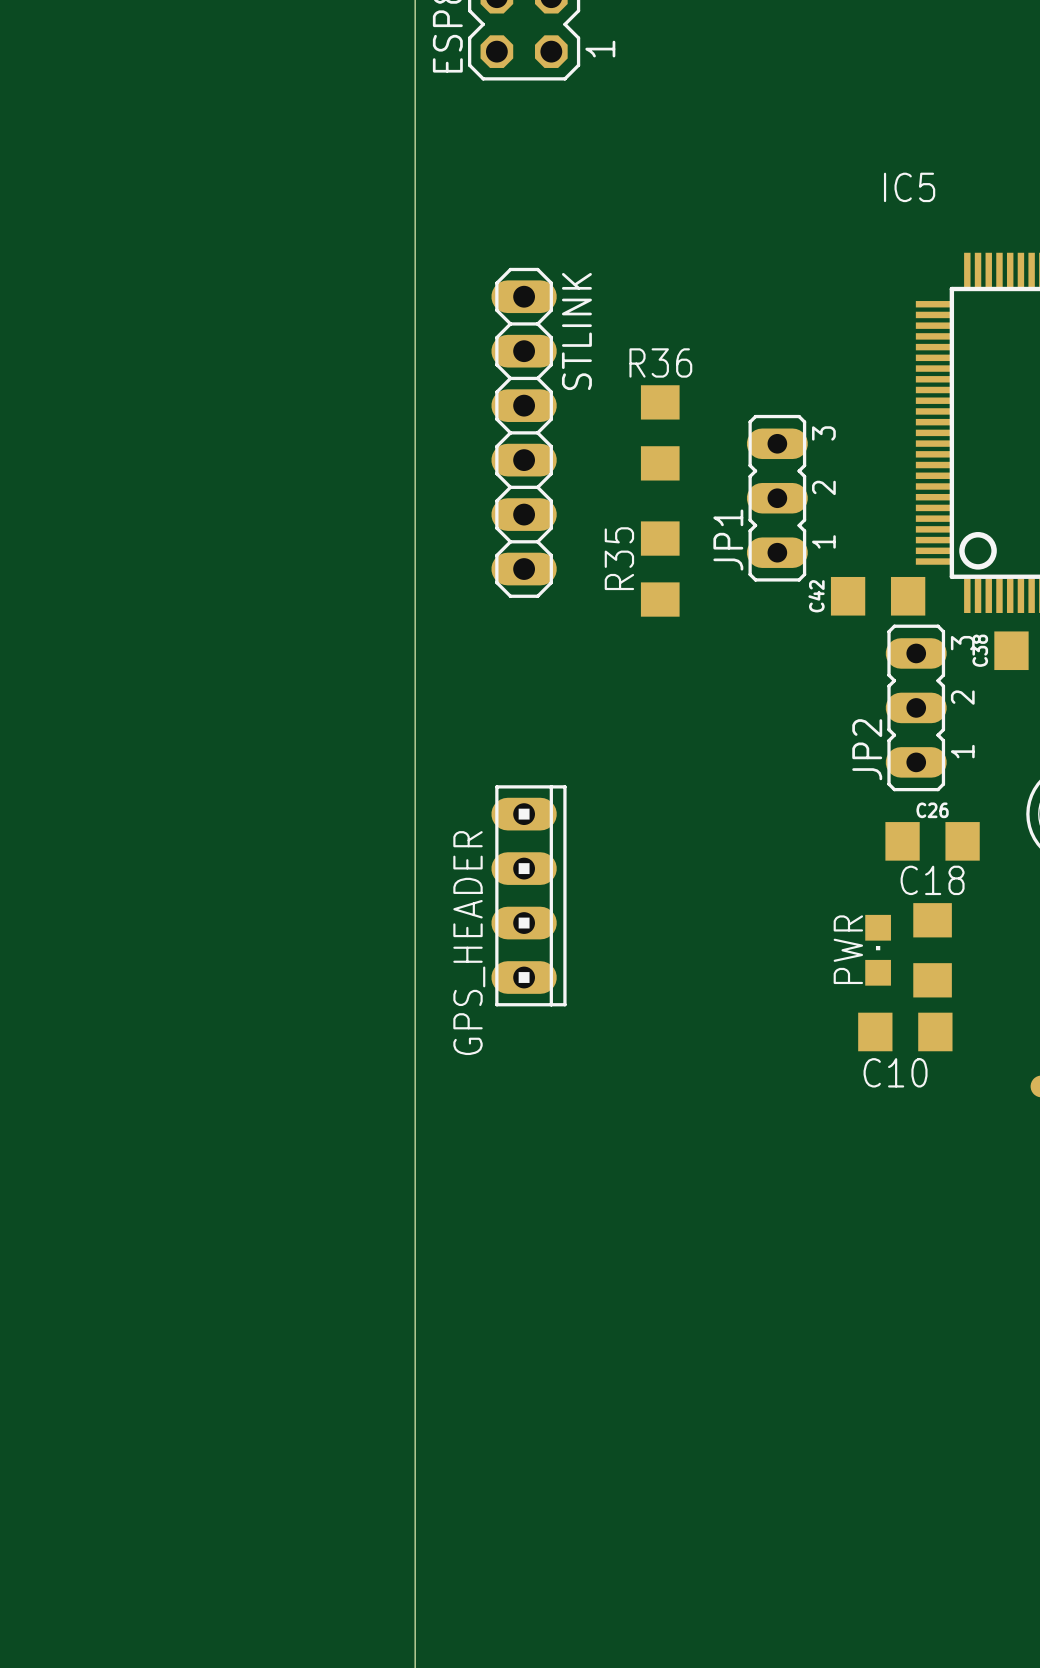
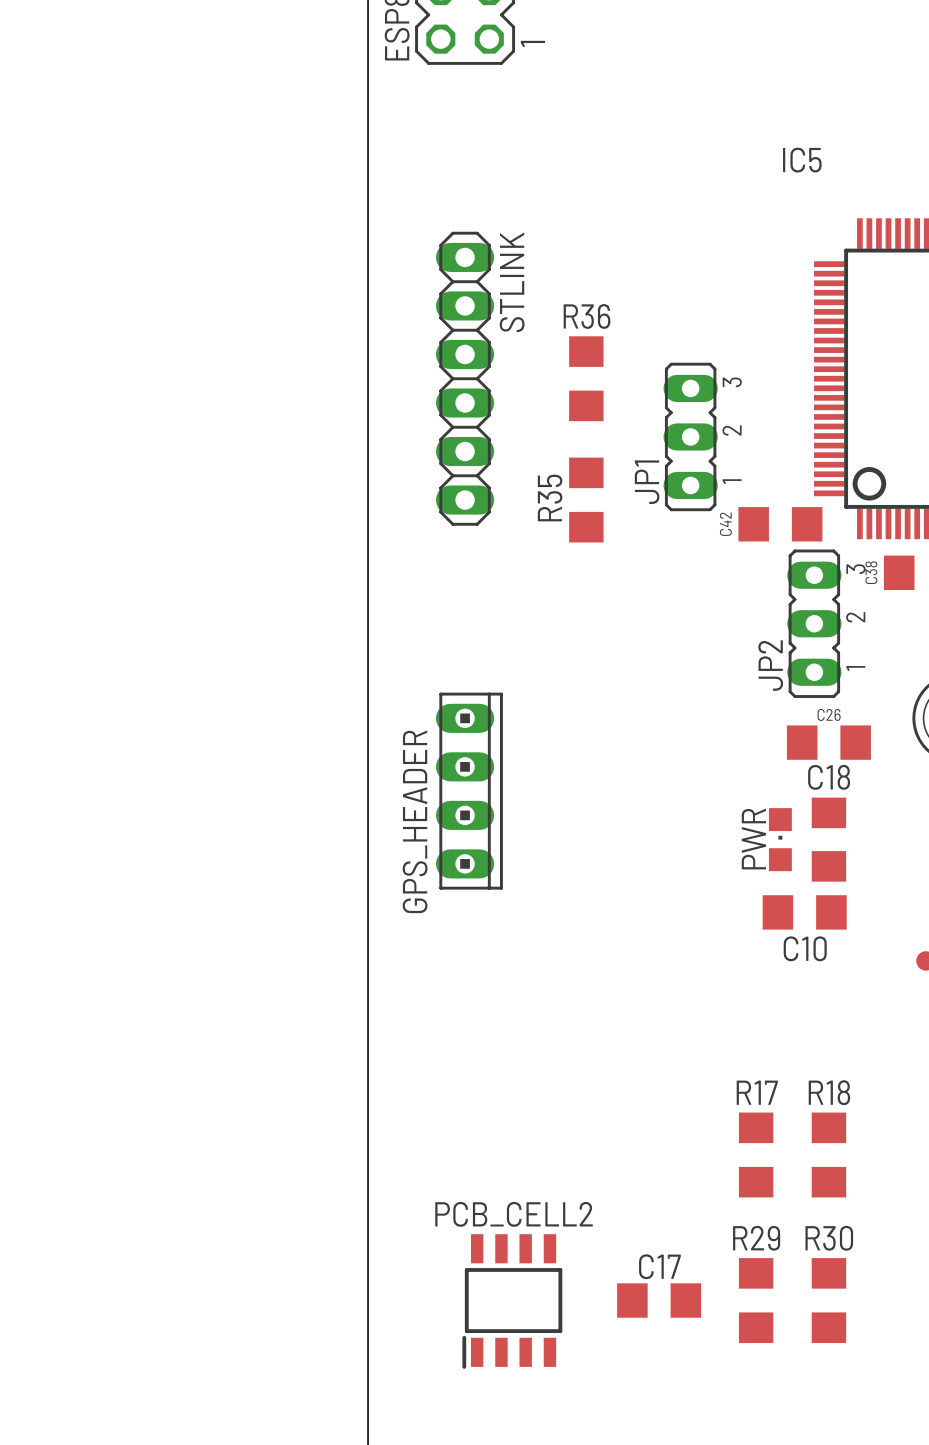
R17: none -> (756, 1154)
R18: none -> (828, 1154)
C17: none -> (659, 1300)
R29: none -> (756, 1300)
R30: none -> (828, 1300)
PCB_CELL2: none -> (512, 1301)

